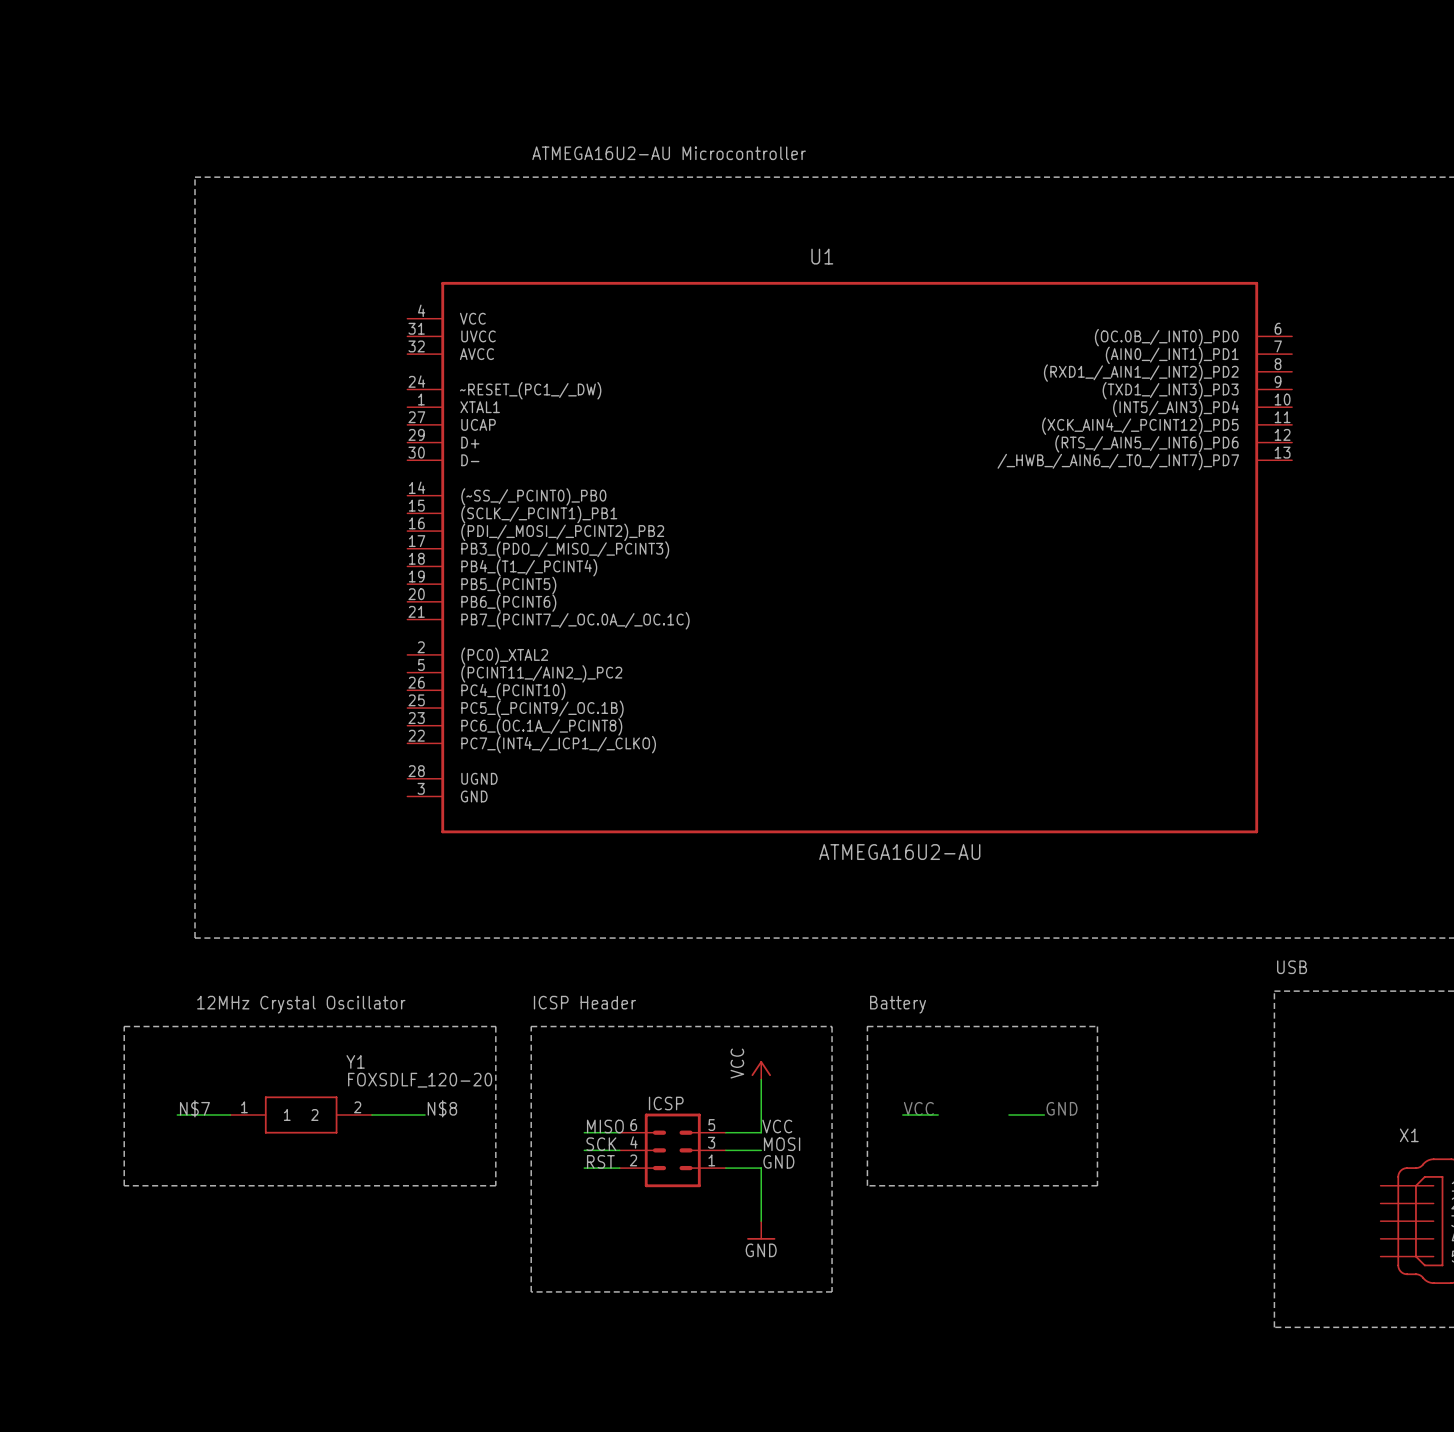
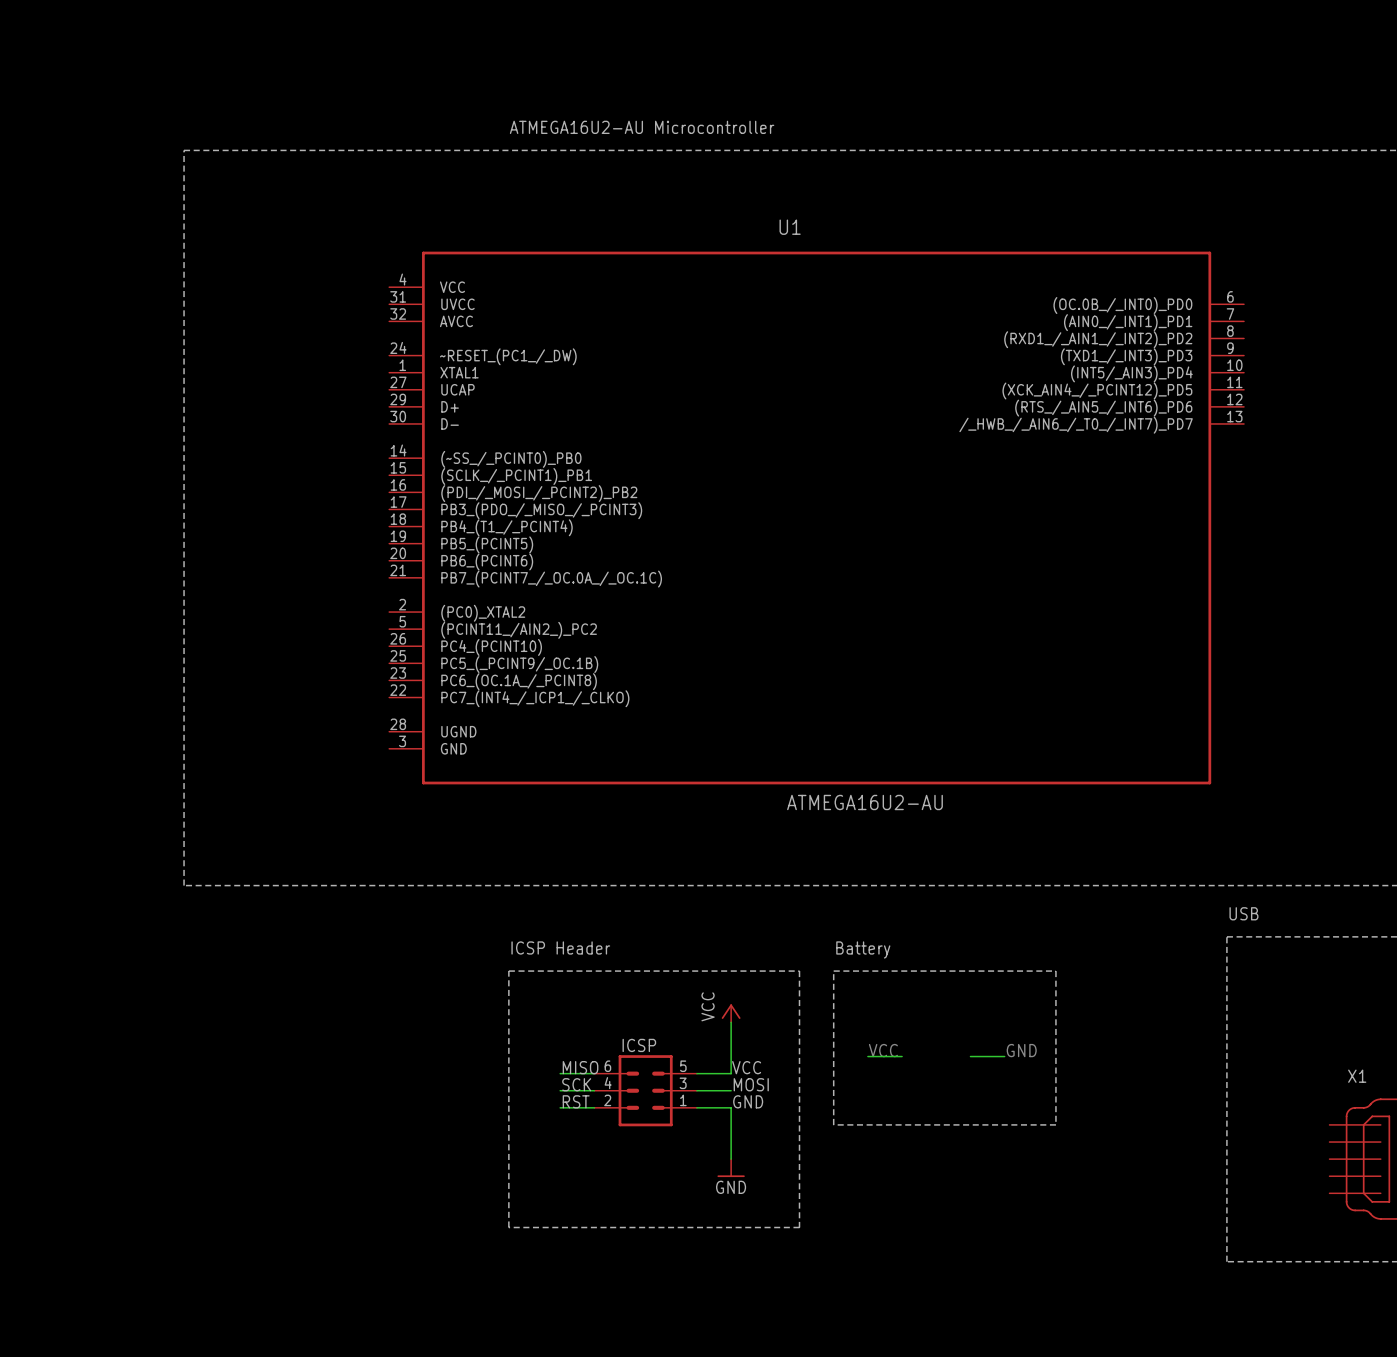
text: 12MHz Crystal Oscillator (301, 1004) -> none
line: (124, 1026) (495, 1026) (495, 1185) (124, 1185) (124, 1026) -> none
label: N$7 (194, 1108) -> none
label: N$8 (442, 1108) -> none
wire: (177, 1115) (230, 1115) -> none
Y1: FOXSDLF_120-20 (301, 1115) -> none
wire: (371, 1115) (425, 1115) -> none

